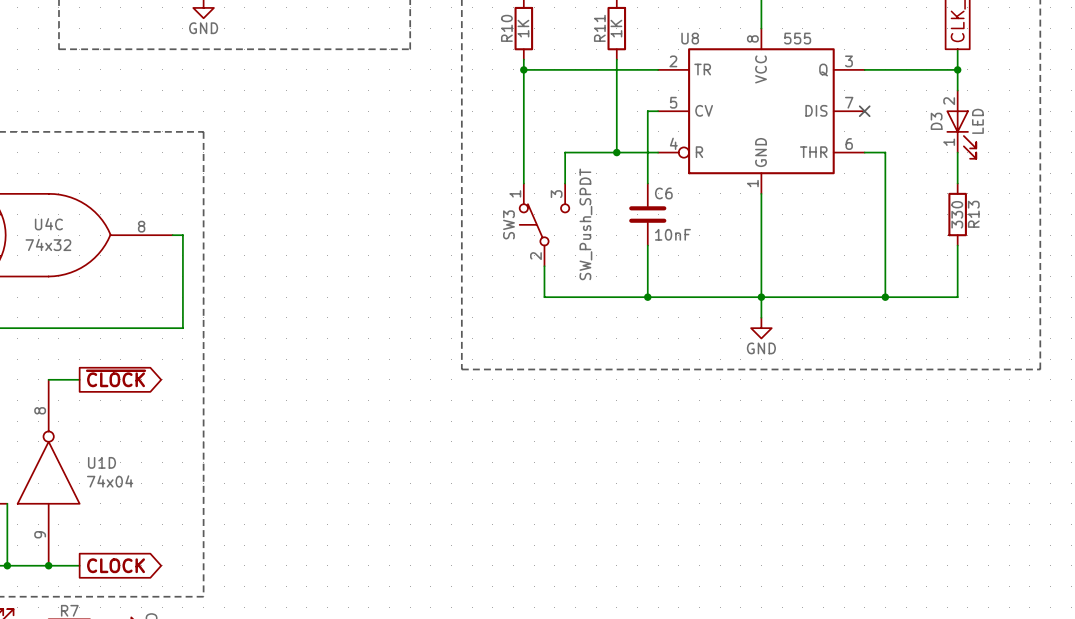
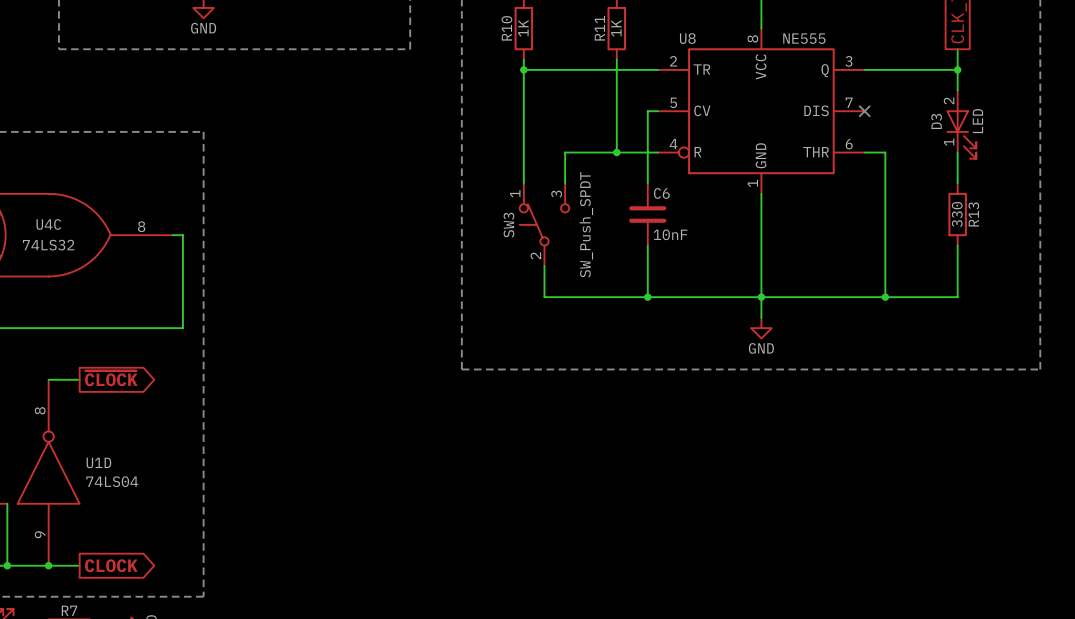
U8 value: 555 (797, 38) -> NE555 (804, 38)
U4C value: 74x32 (48, 244) -> 74LS32 (48, 245)
U1D value: 74x04 (110, 481) -> 74LS04 (112, 481)

